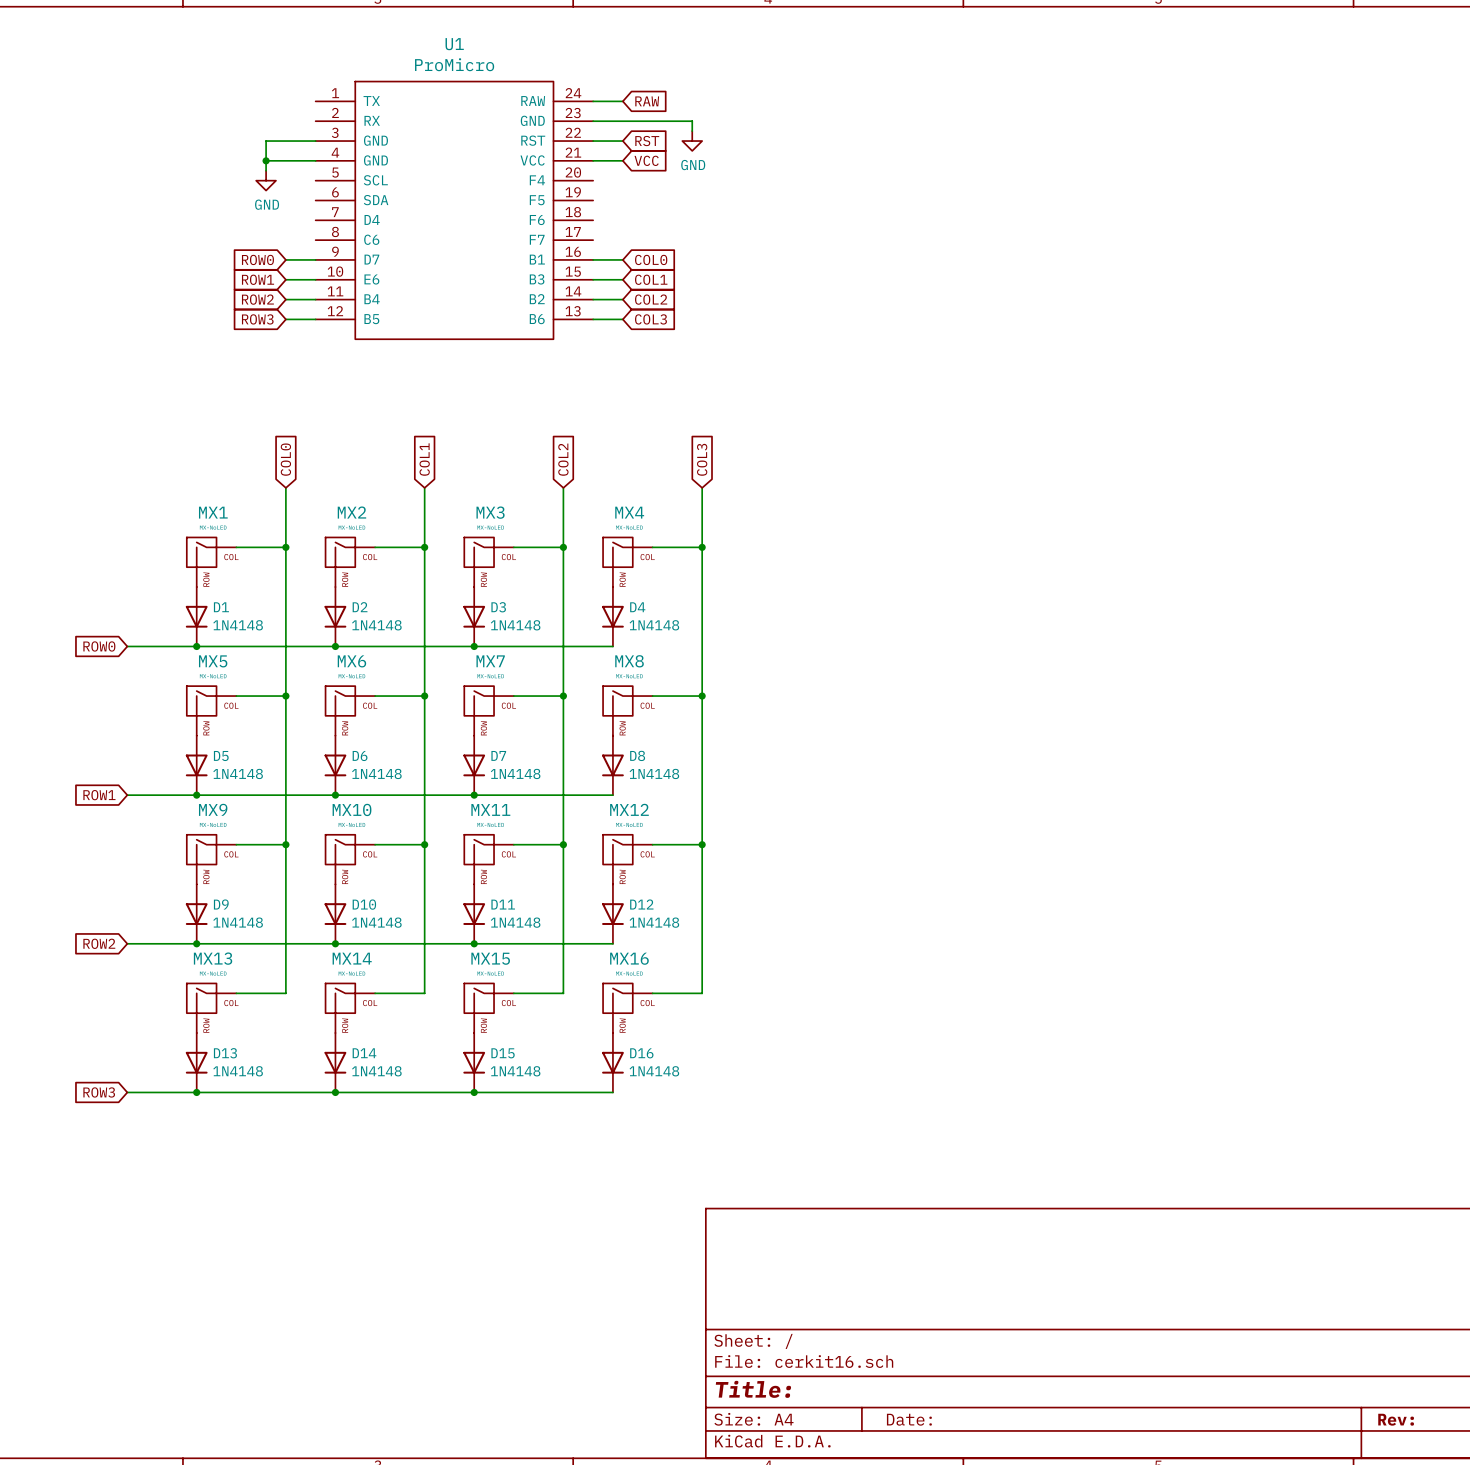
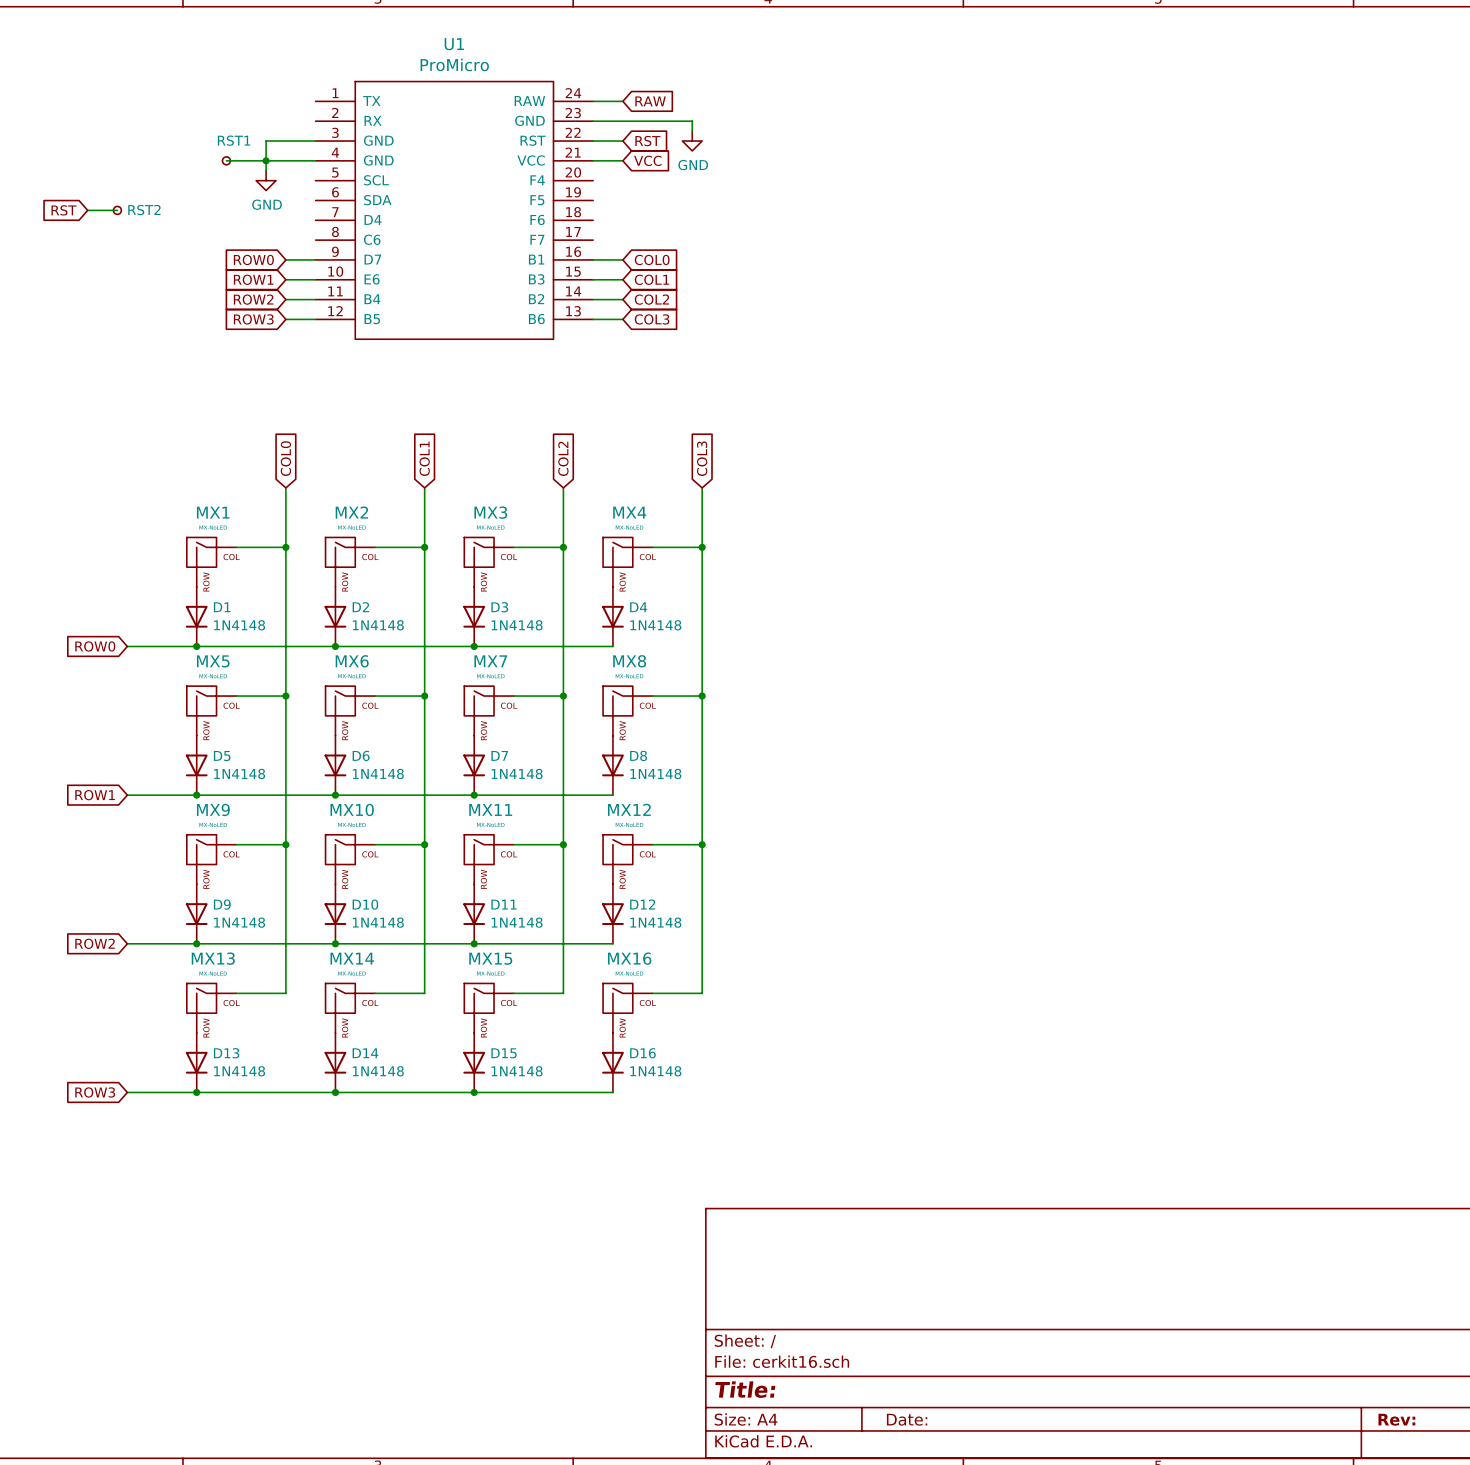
wire: none -> (226, 160) (266, 160)
RST1: none -> (226, 160)
global label: none -> RST (64, 210)
wire: none -> (87, 210) (117, 210)
RST2: none -> (117, 210)

